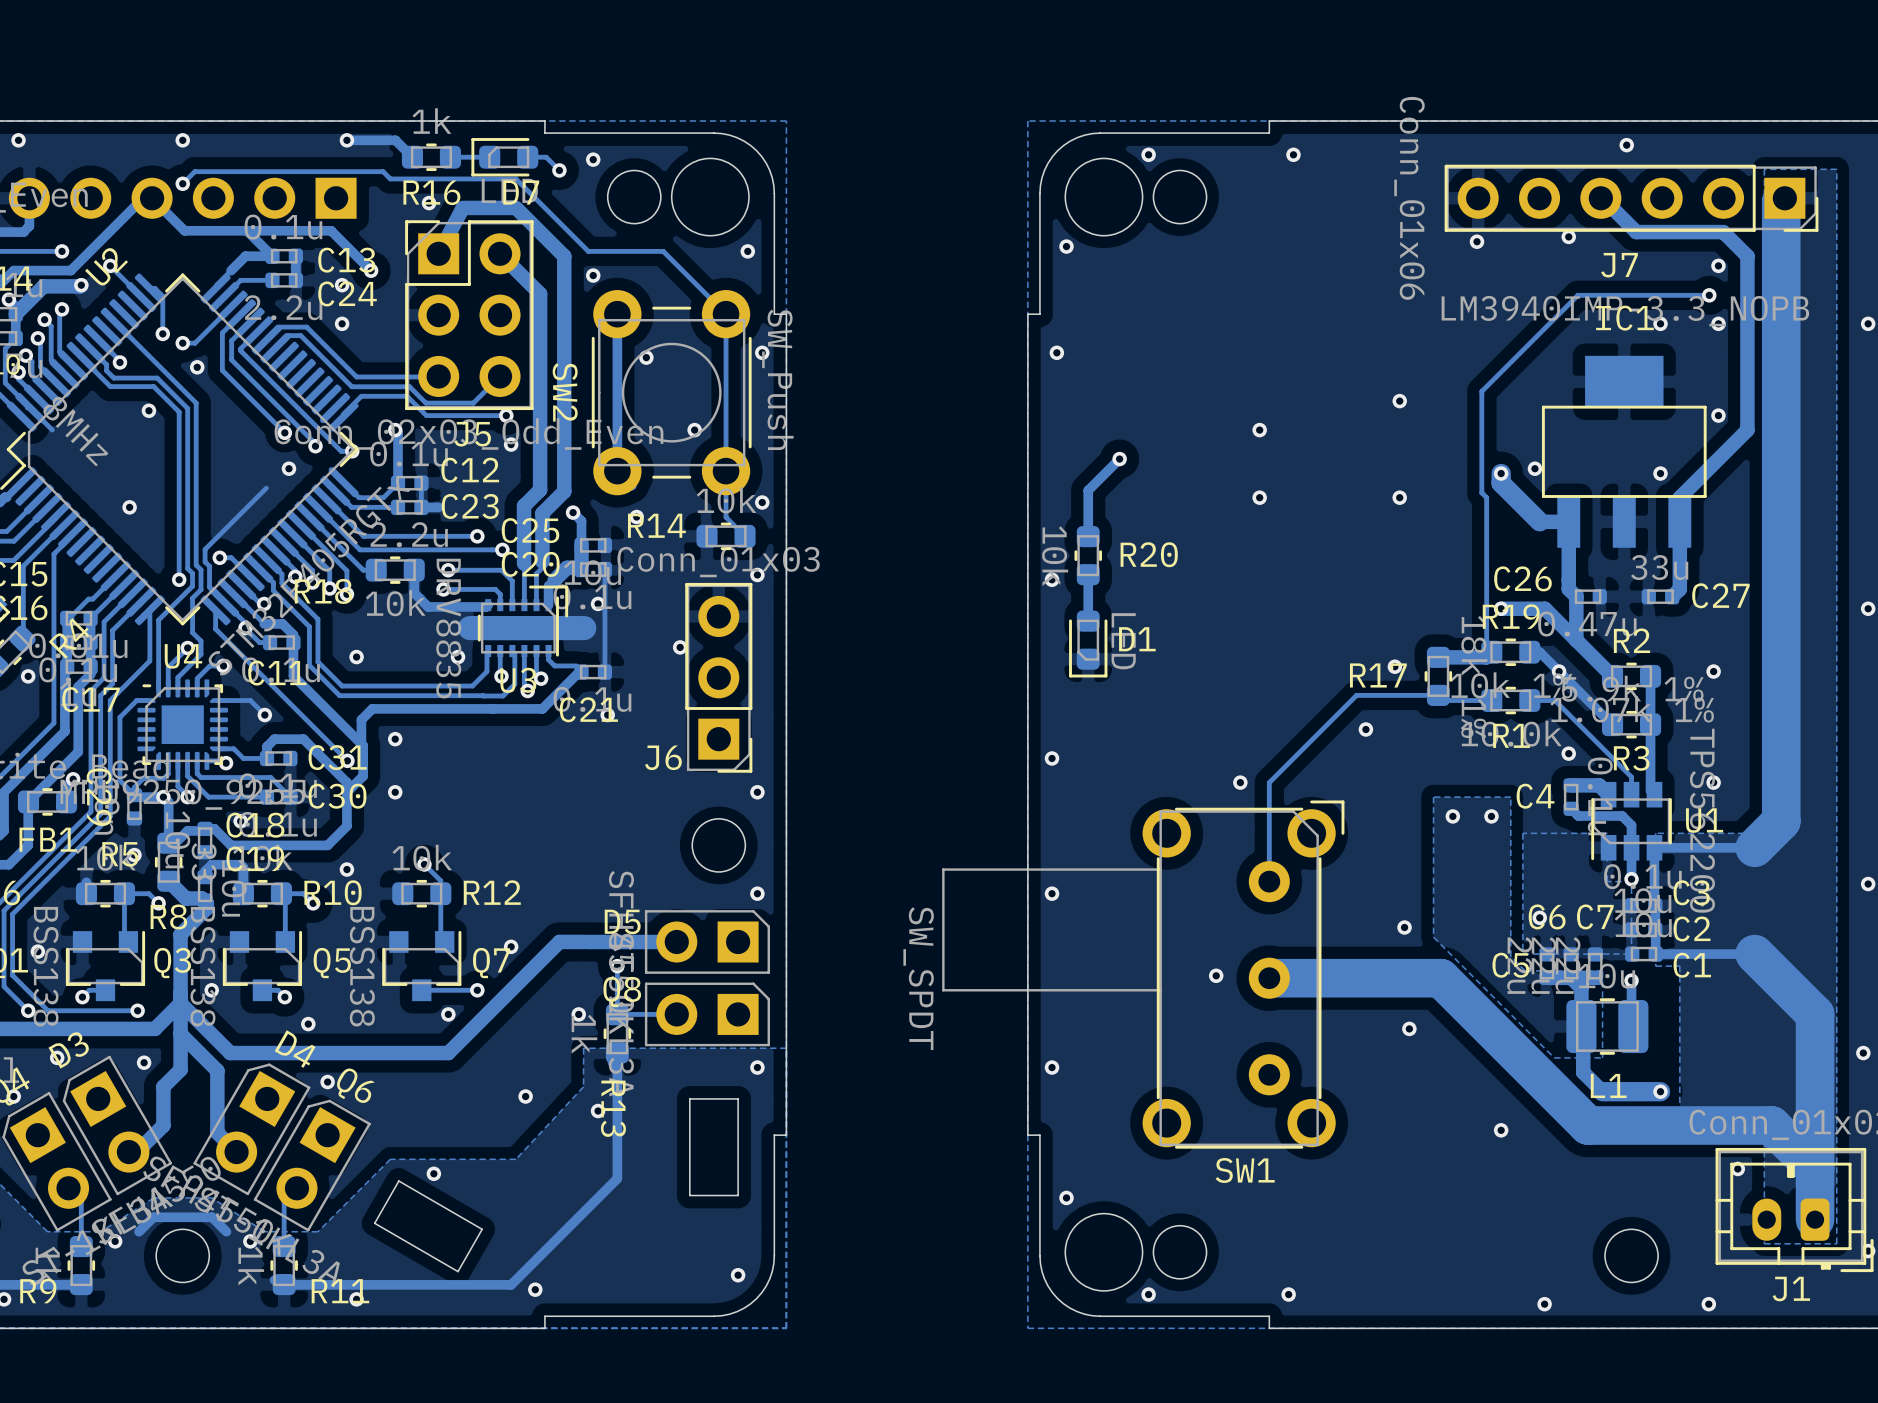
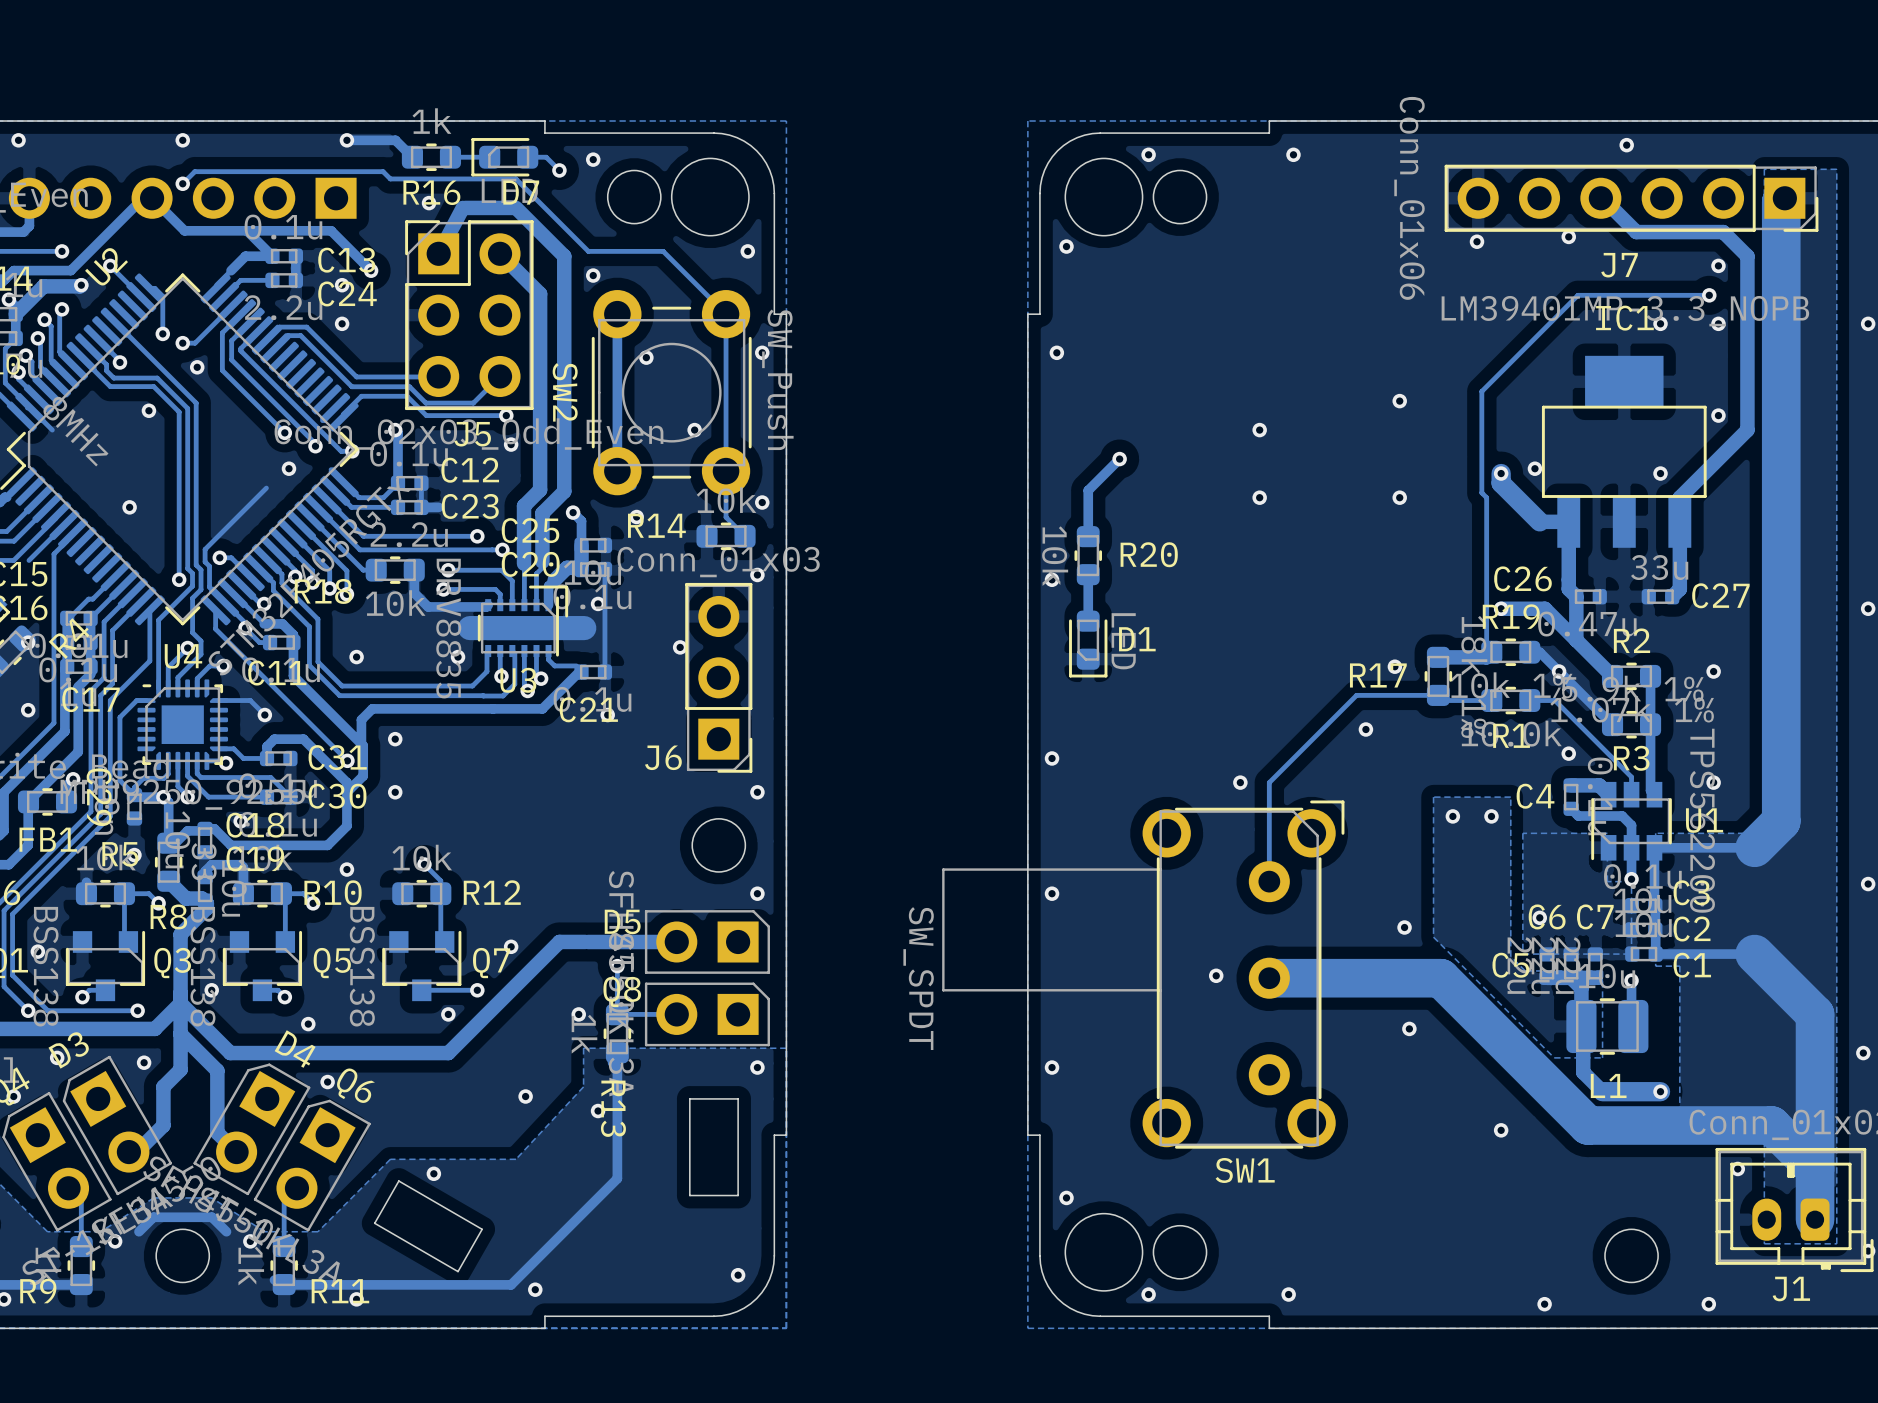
track: (28, 560) (23, 566) (23, 637) -> none
via: none -> (28, 642)
via: (28, 676) -> none
via: none -> (28, 710)

